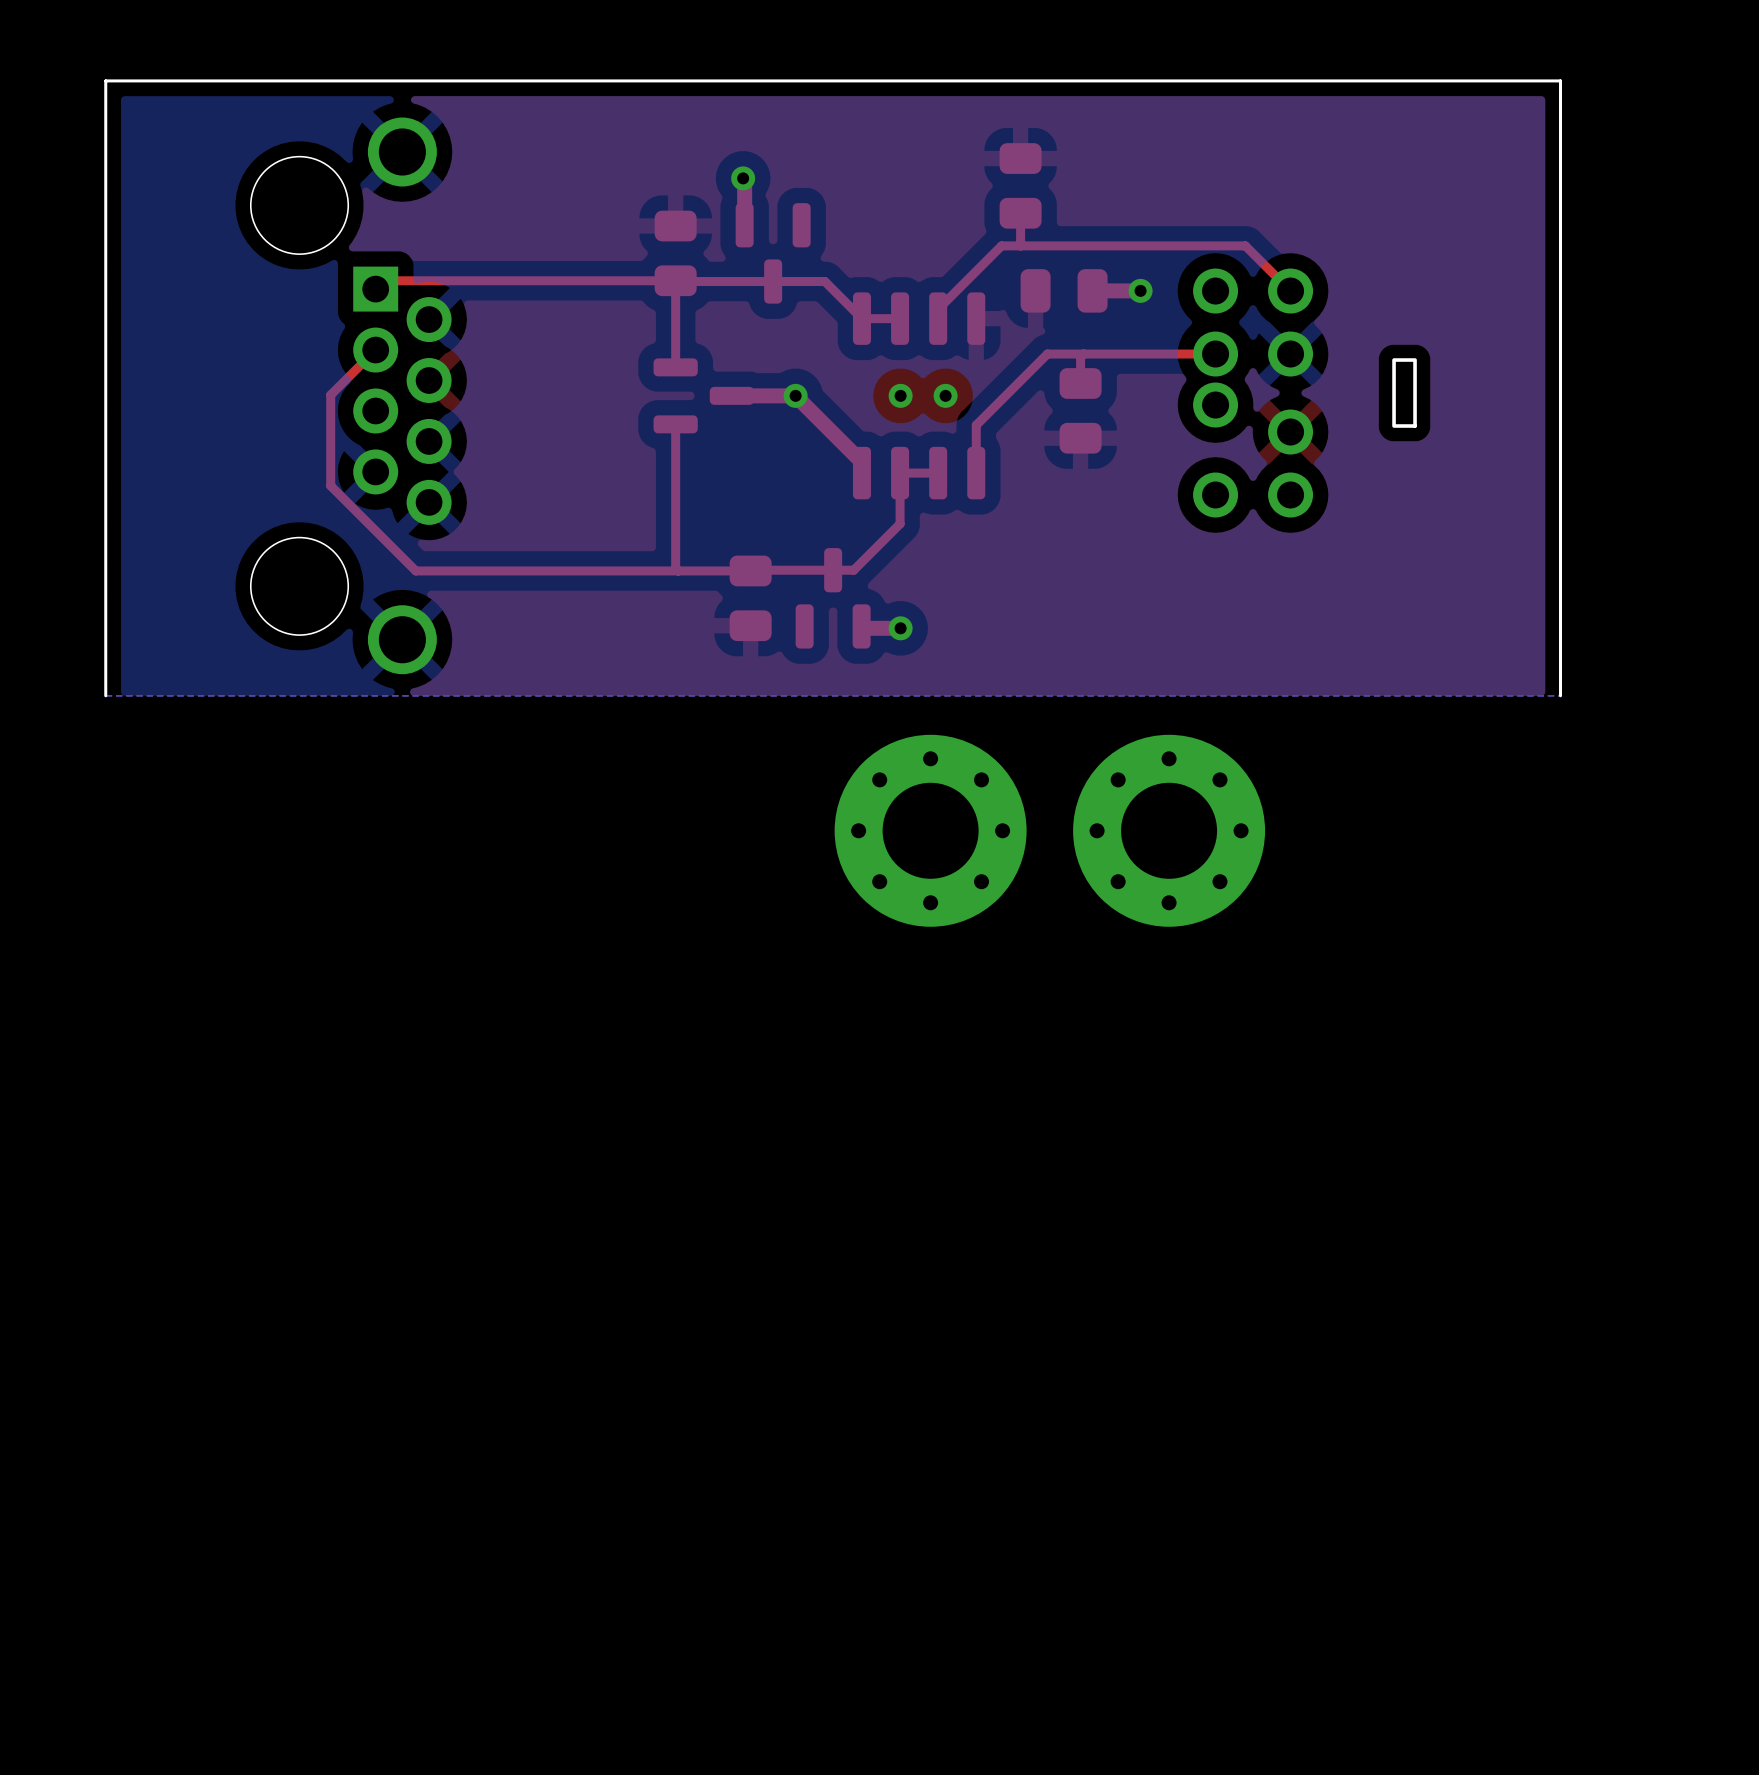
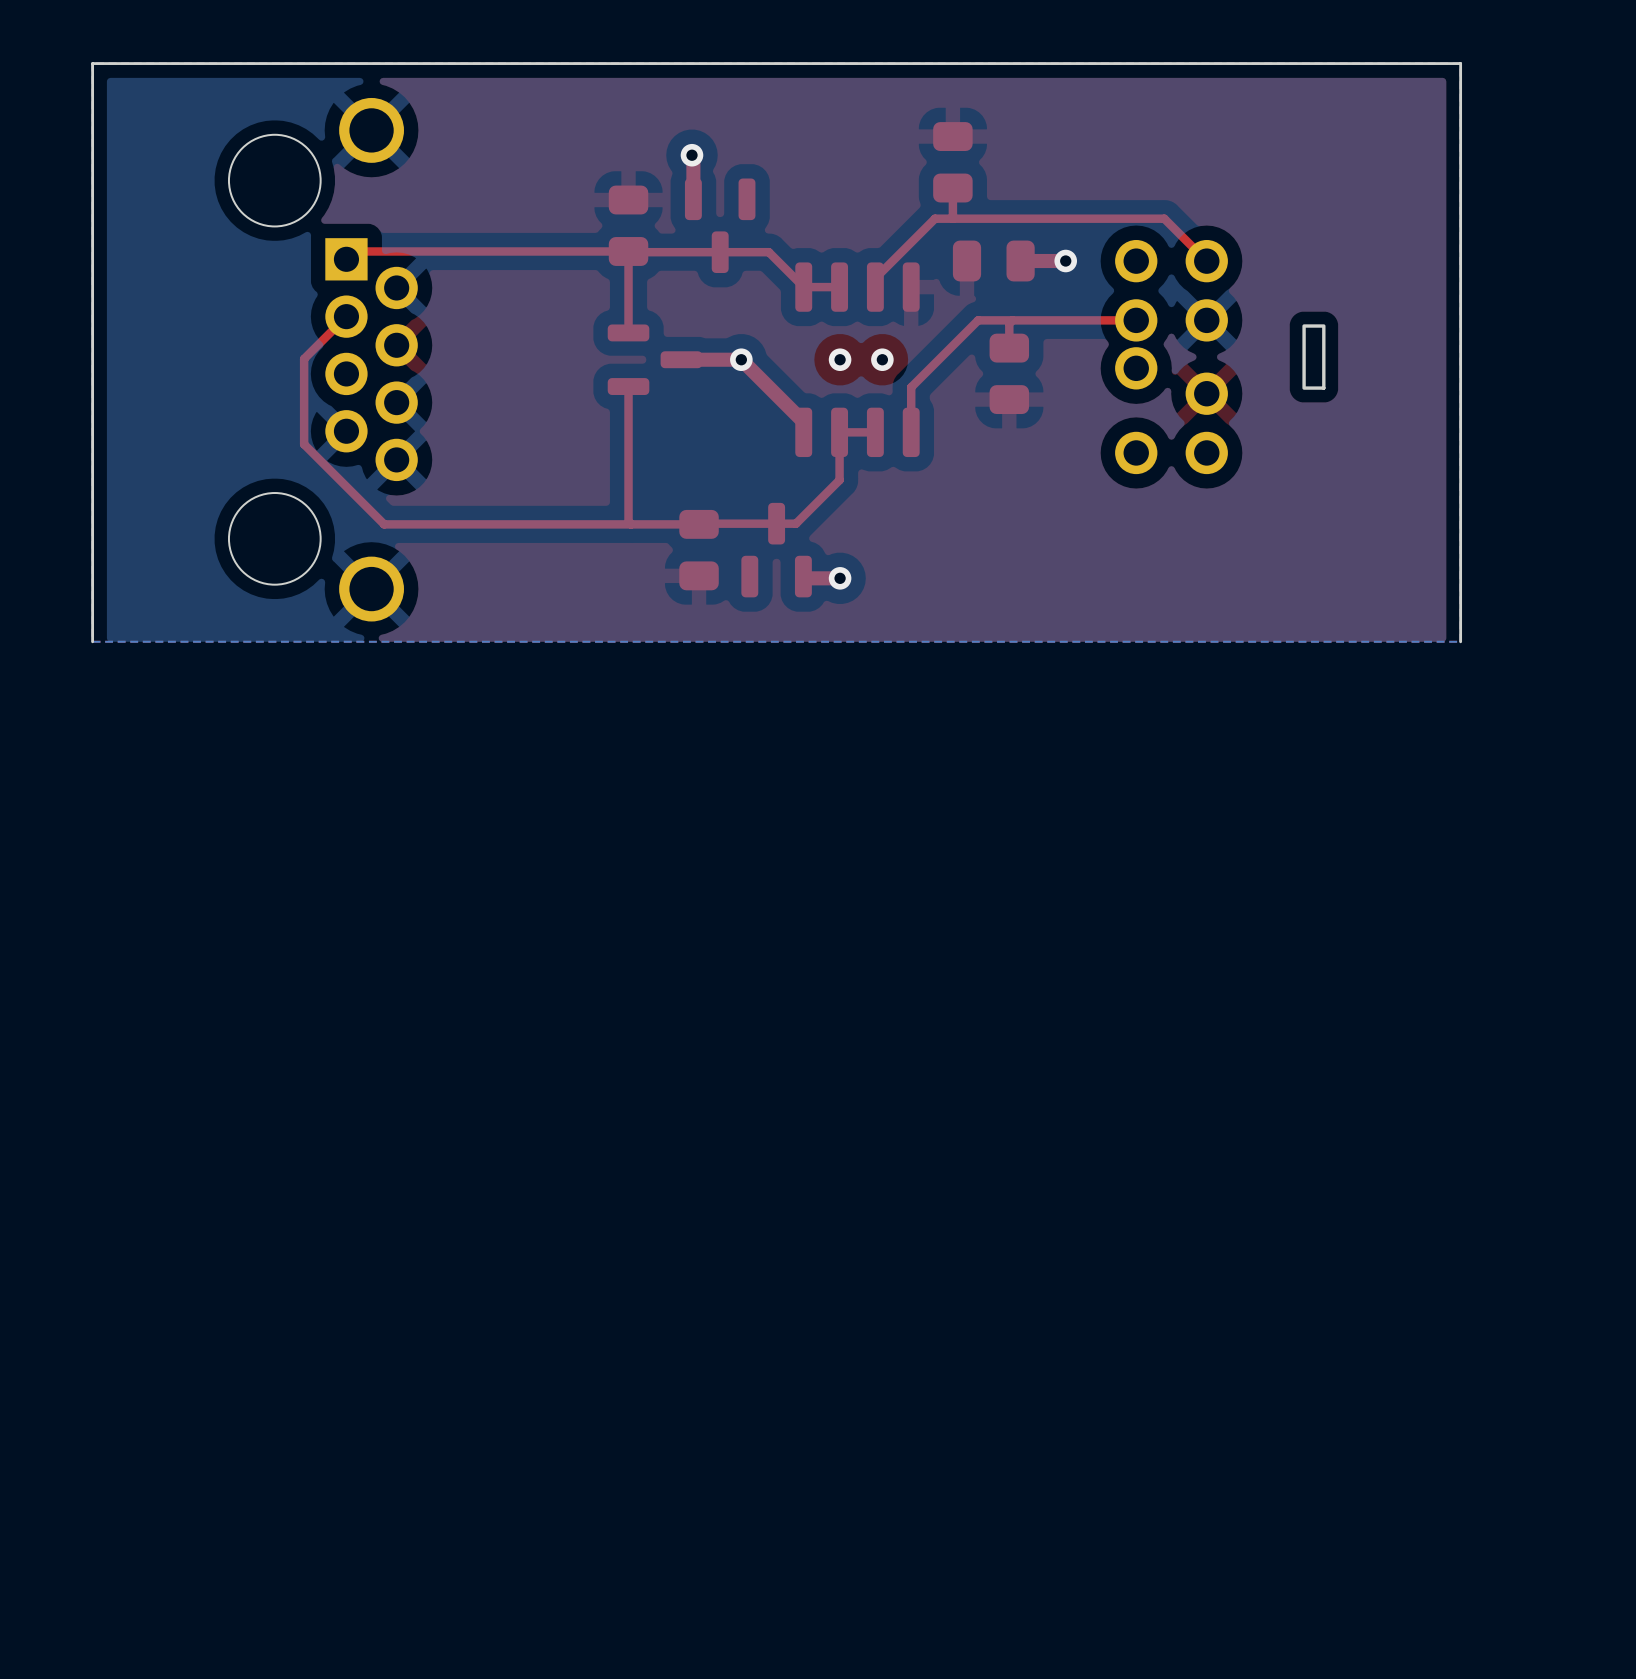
part: (930, 830) -> none
part: (1169, 830) -> none

